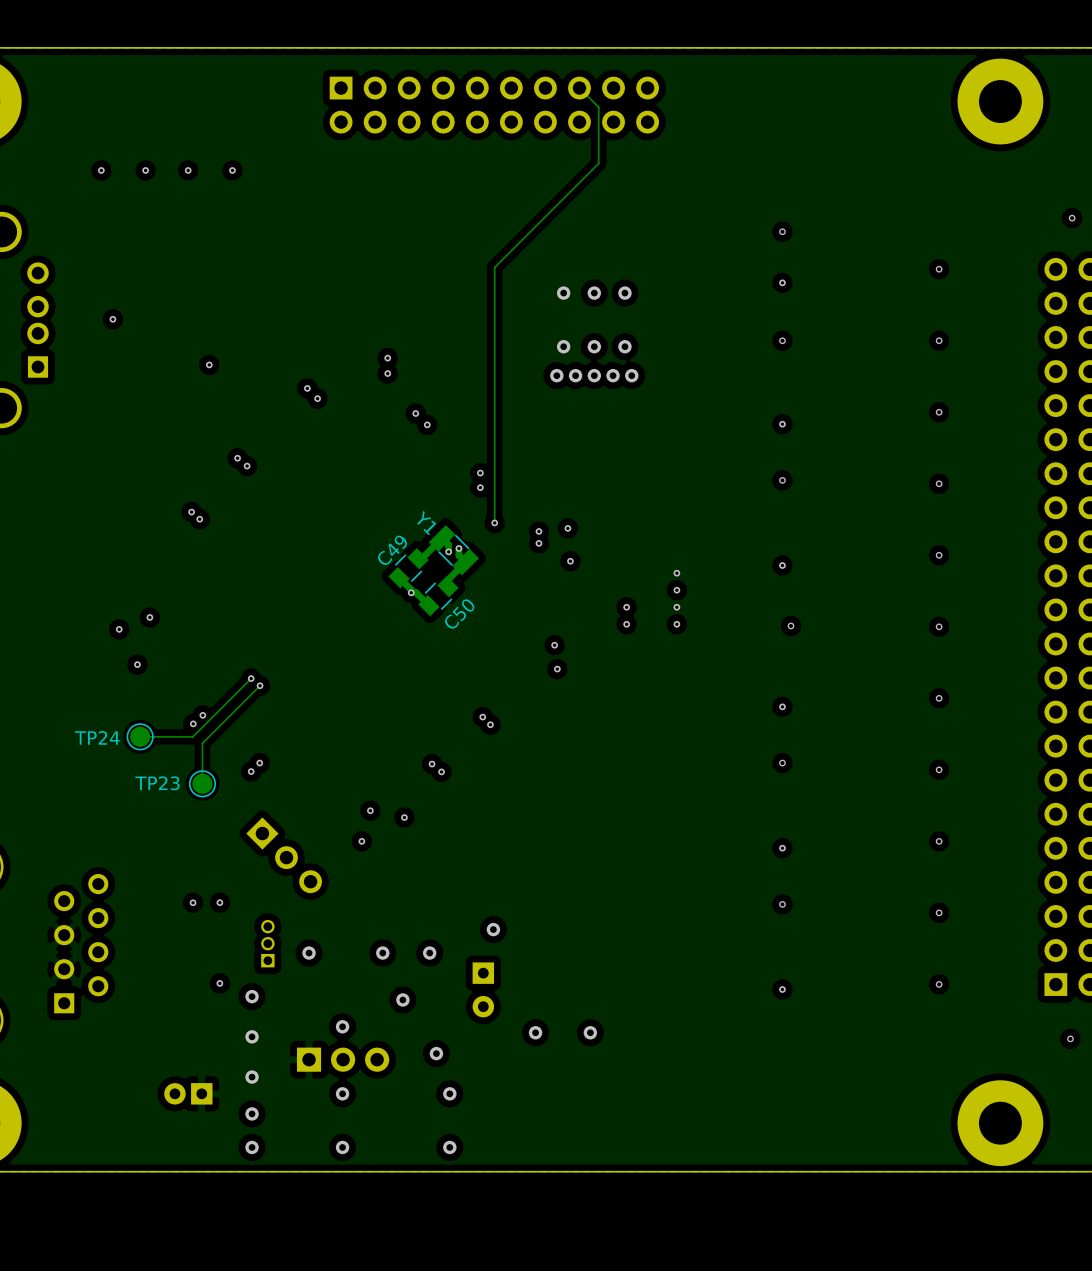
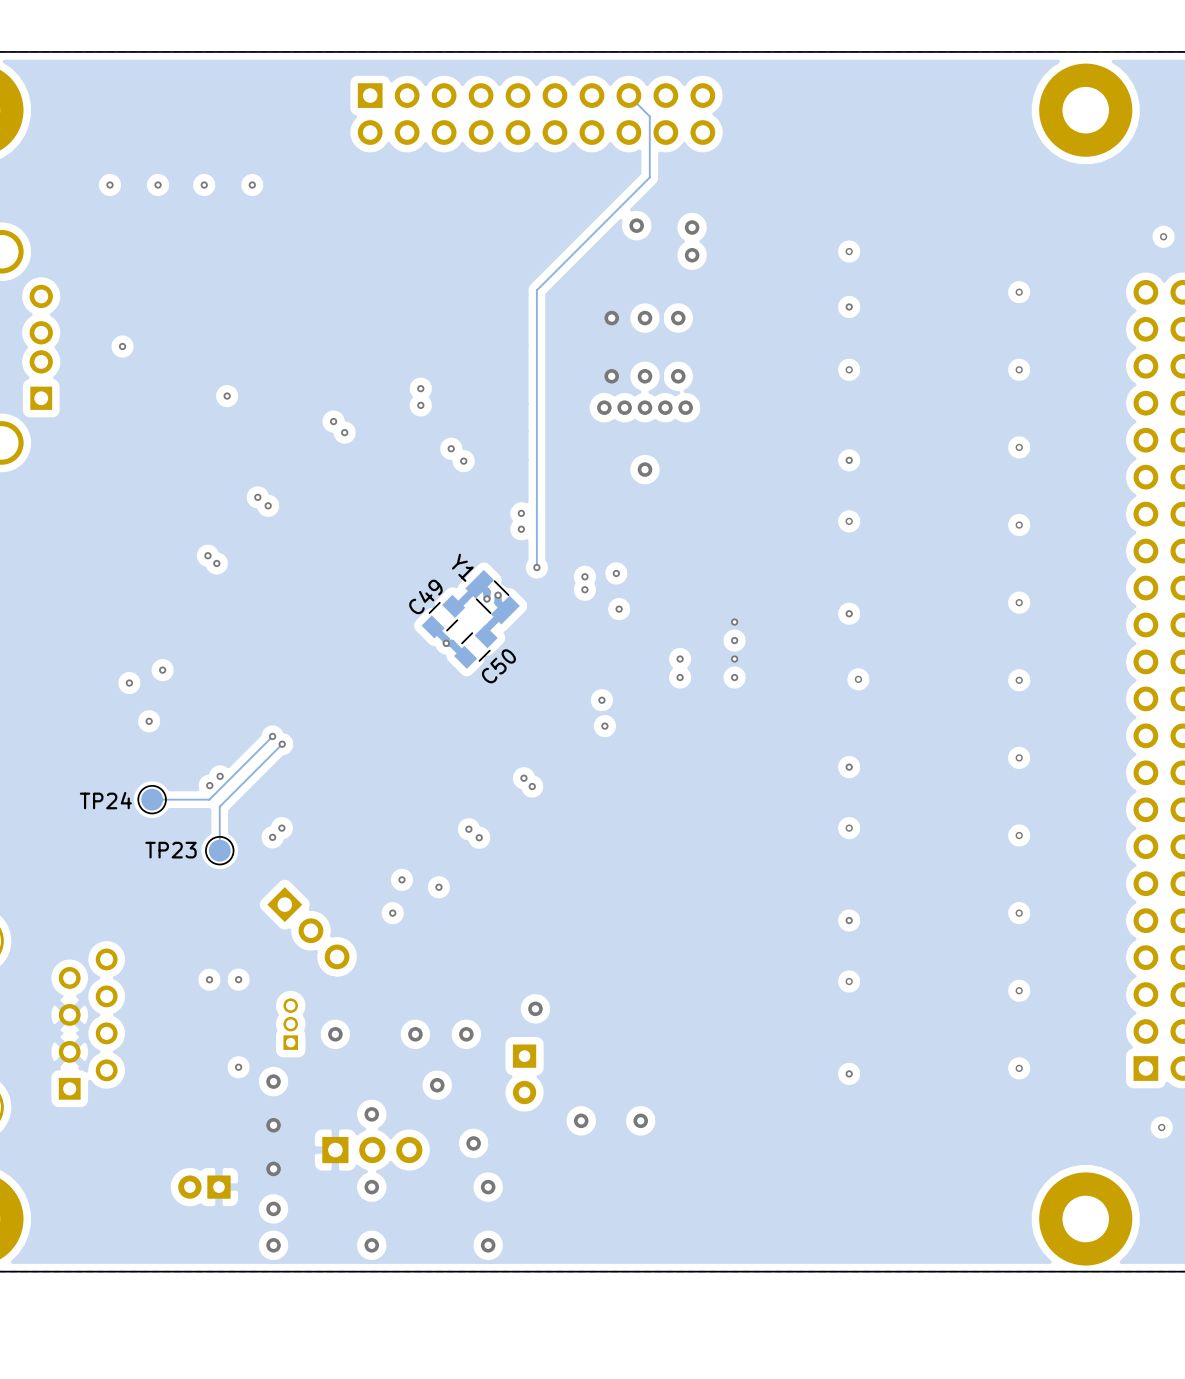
via: none -> (636, 225)
via: none -> (692, 227)
via: none -> (692, 255)
via: none -> (644, 469)

